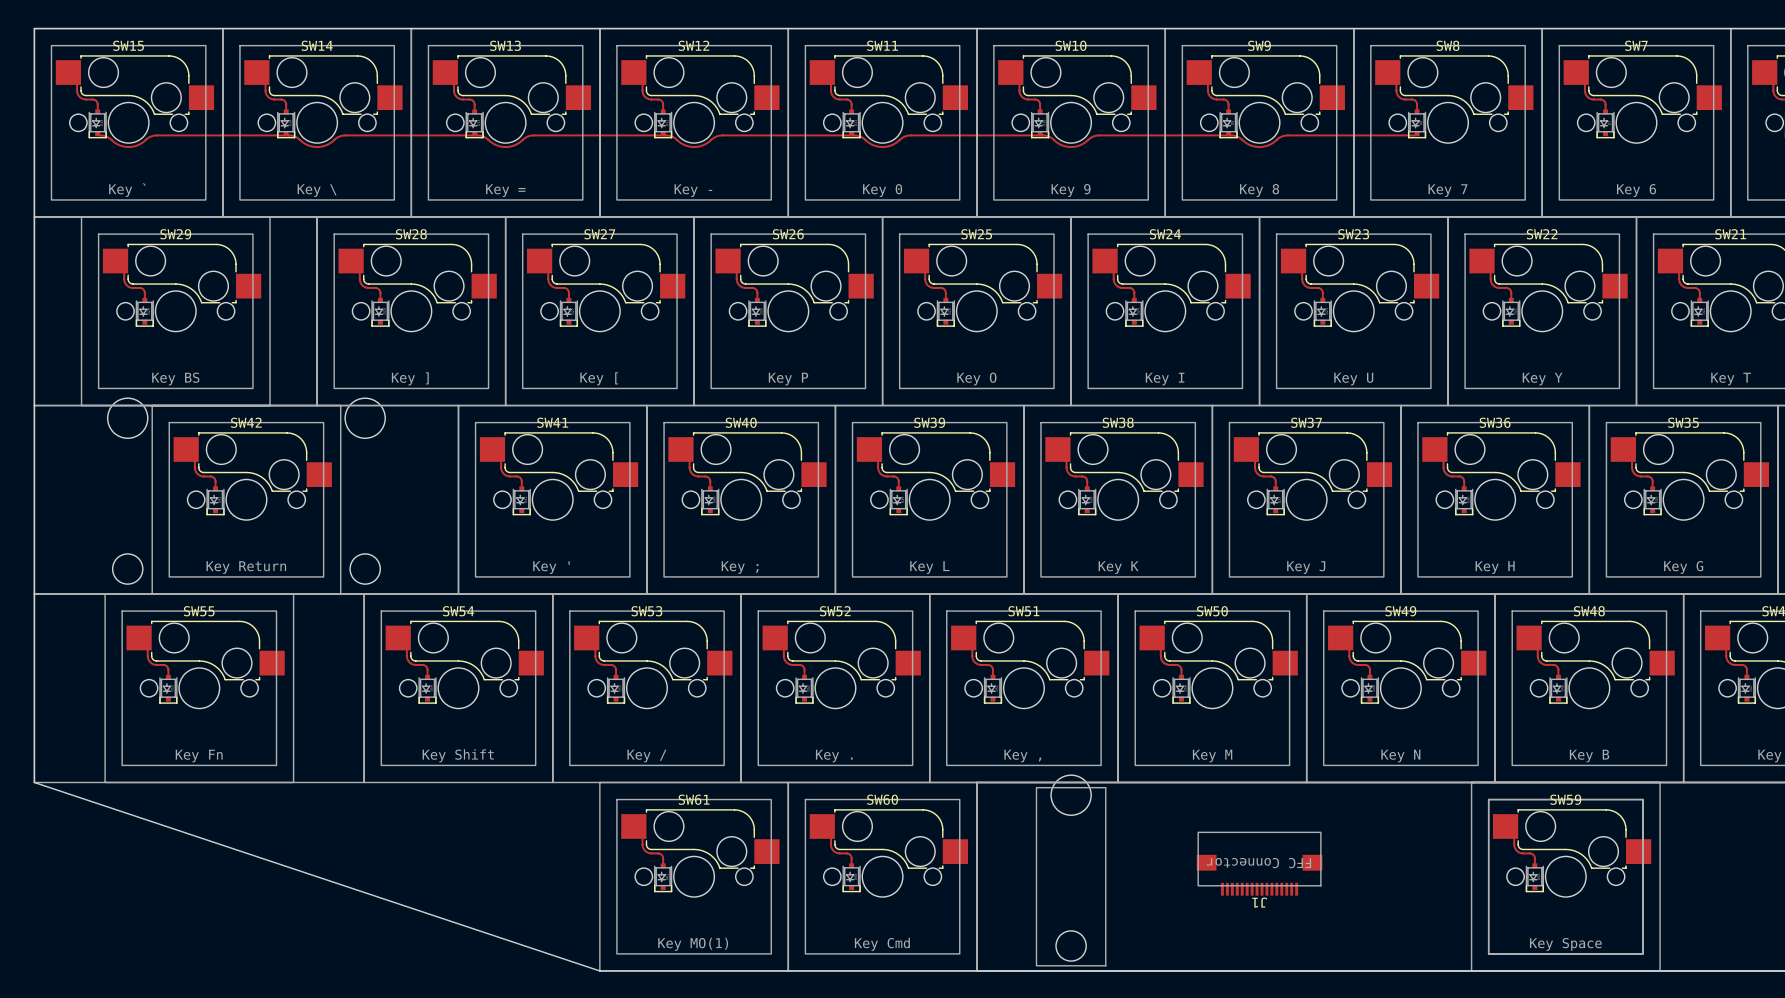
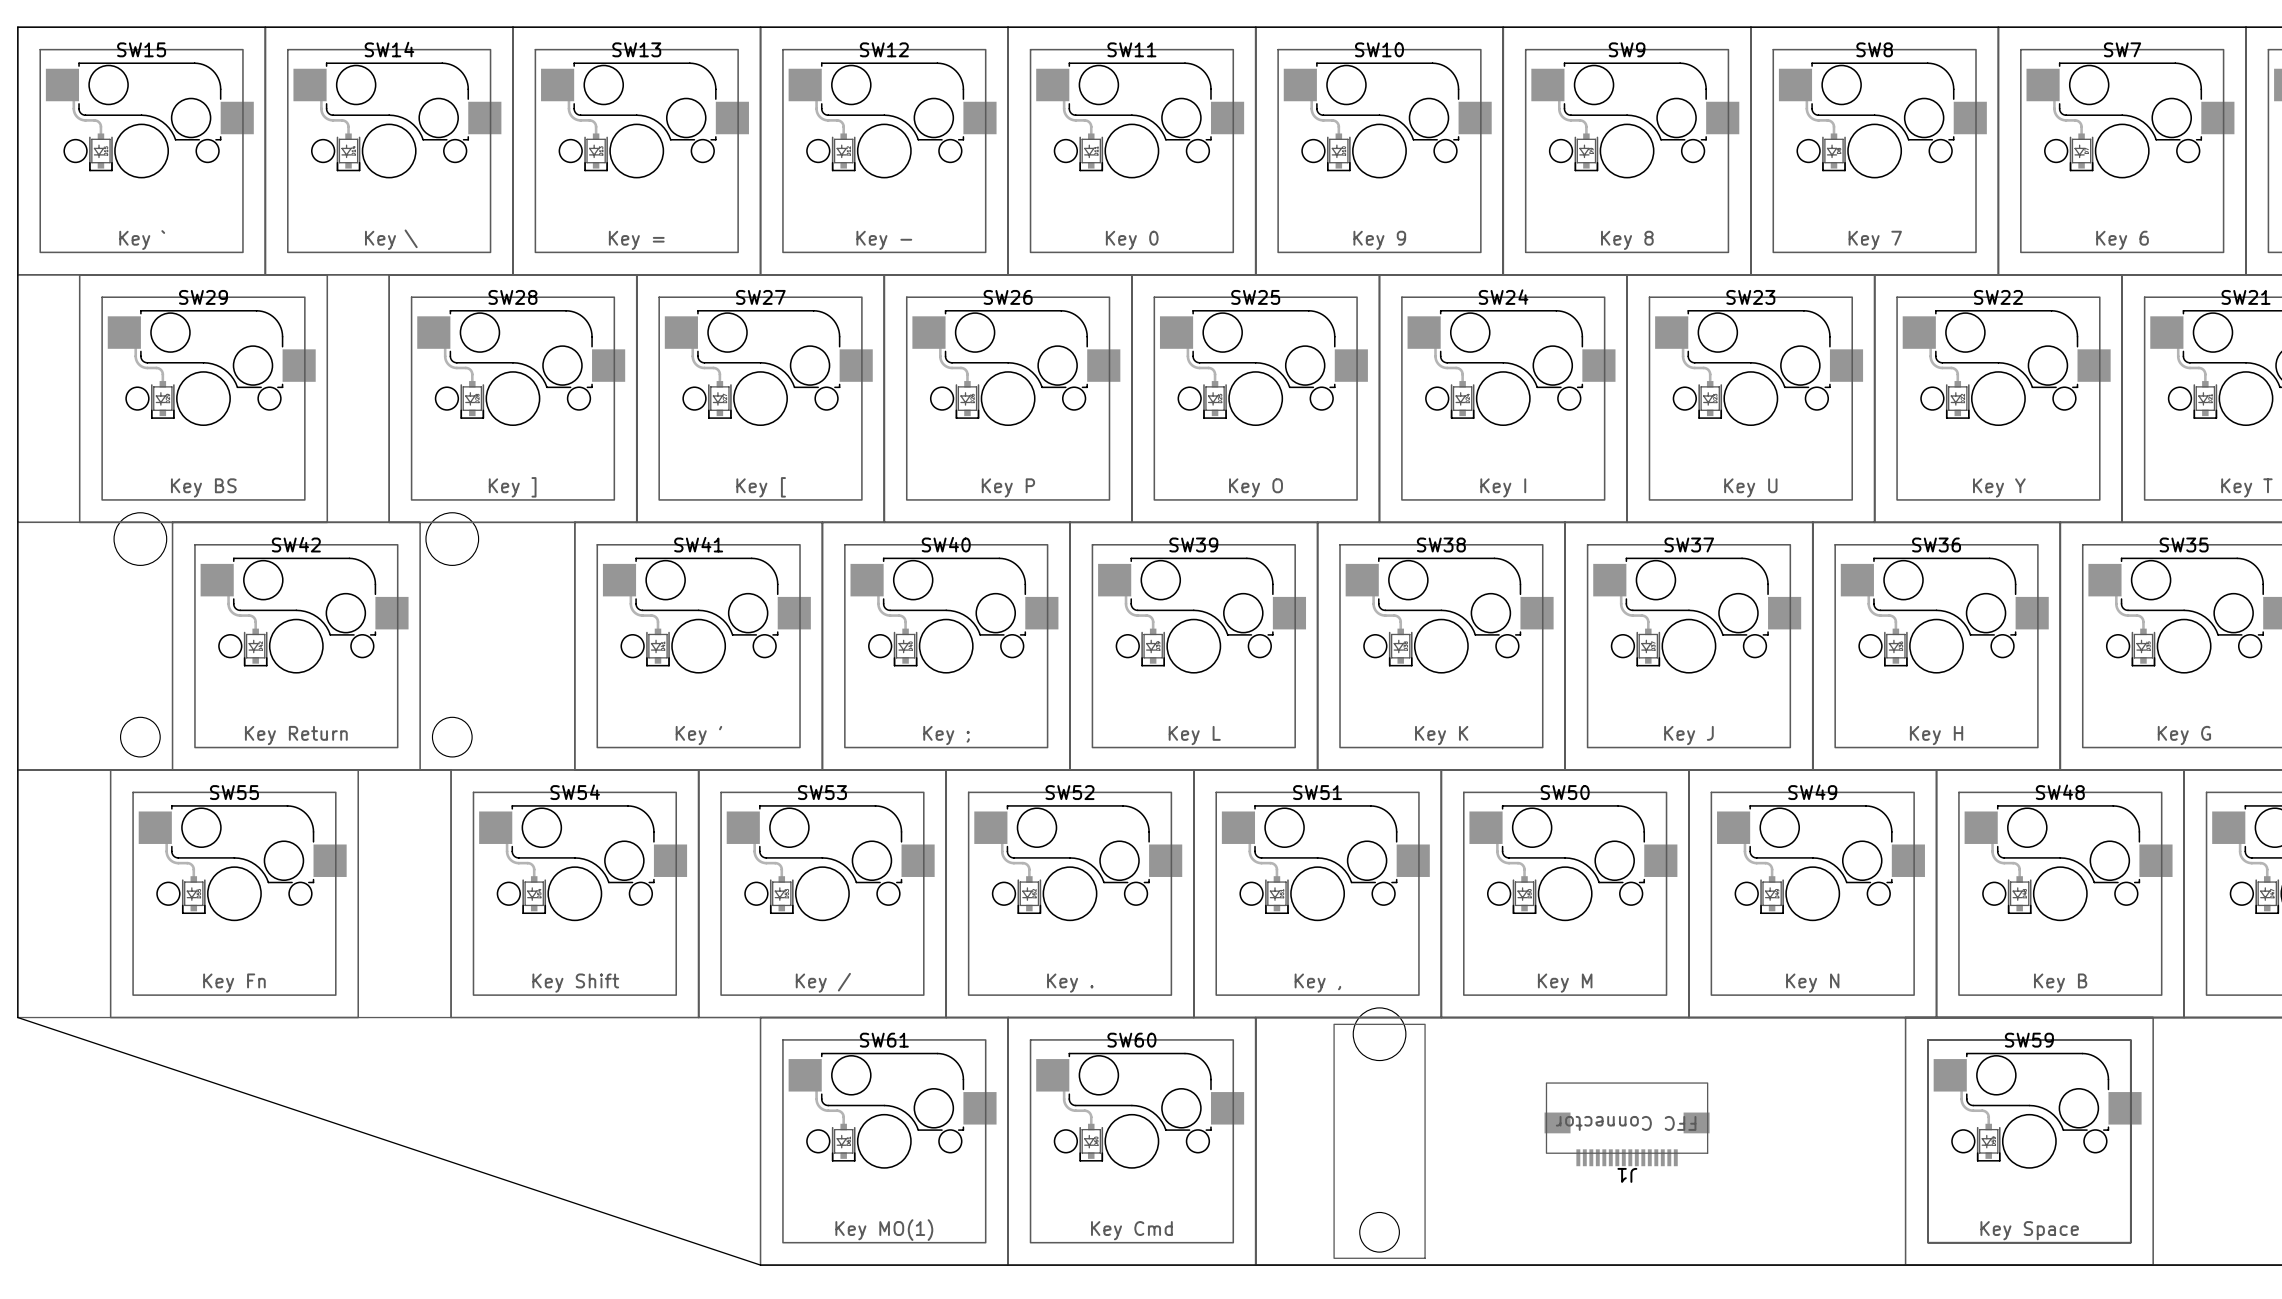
track: (100, 135) (107, 137) (119, 145) (128, 147) (137, 145) (149, 137) (157, 135) (290, 135) (307, 145) (317, 147) (326, 145) (338, 137) (345, 135) (478, 135) (496, 145) (505, 147) (514, 145) (526, 137) (534, 135) (667, 135) (684, 145) (694, 147) (703, 145) (715, 137) (722, 135) (855, 135) (873, 145) (882, 147) (891, 145) (903, 137) (911, 135) (1044, 135) (1061, 145) (1071, 147) (1080, 145) (1097, 135) (1232, 135) (1250, 145) (1259, 147) (1268, 145) (1286, 135) (1414, 135) -> none

